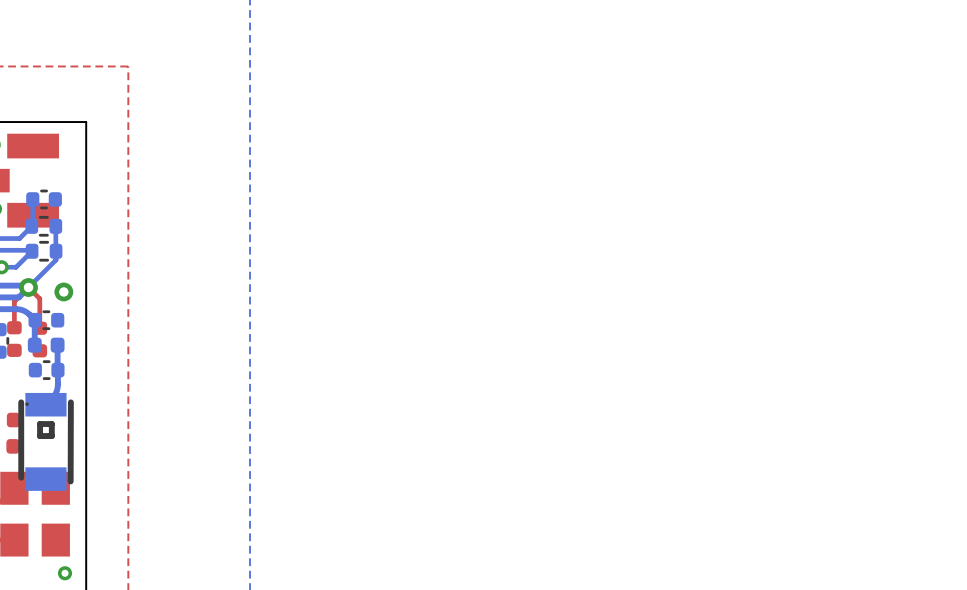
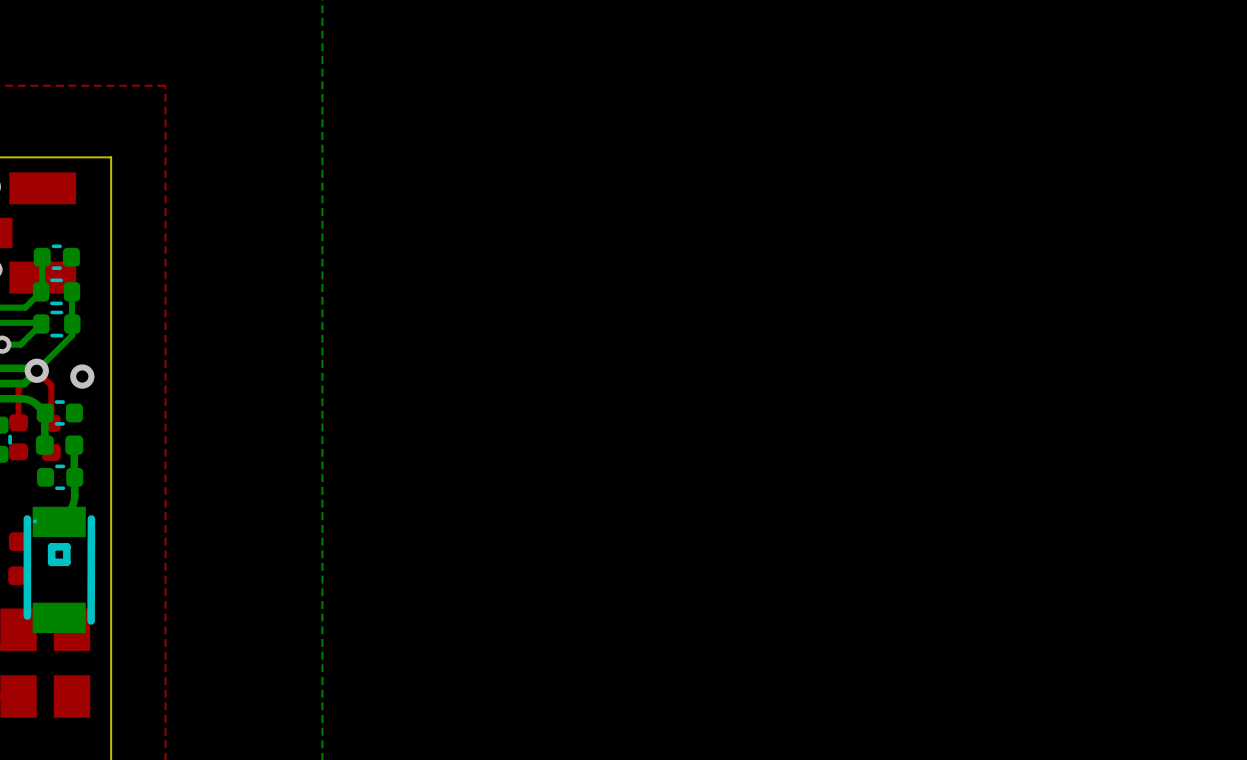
via: (65, 573) -> none

